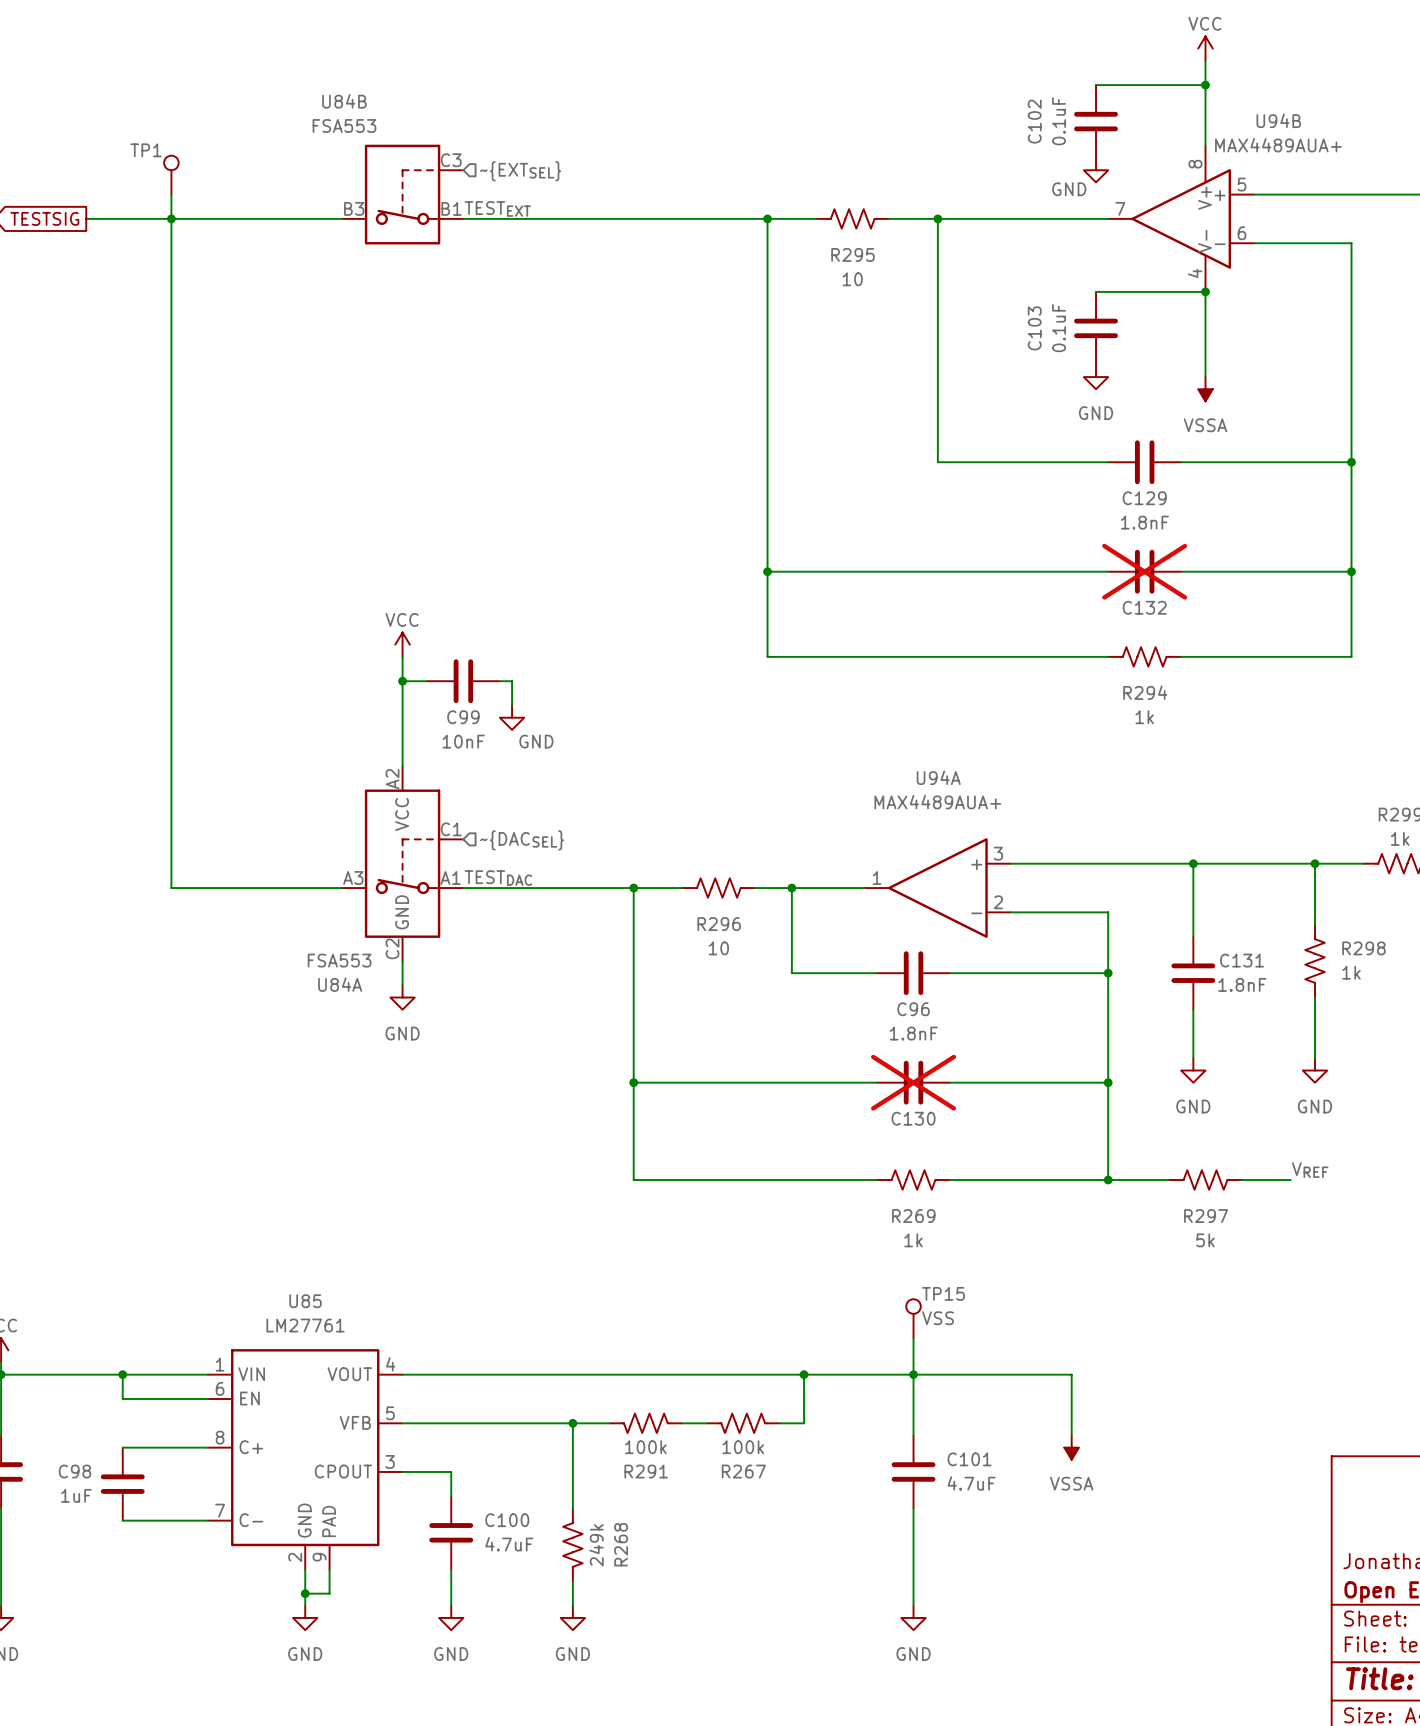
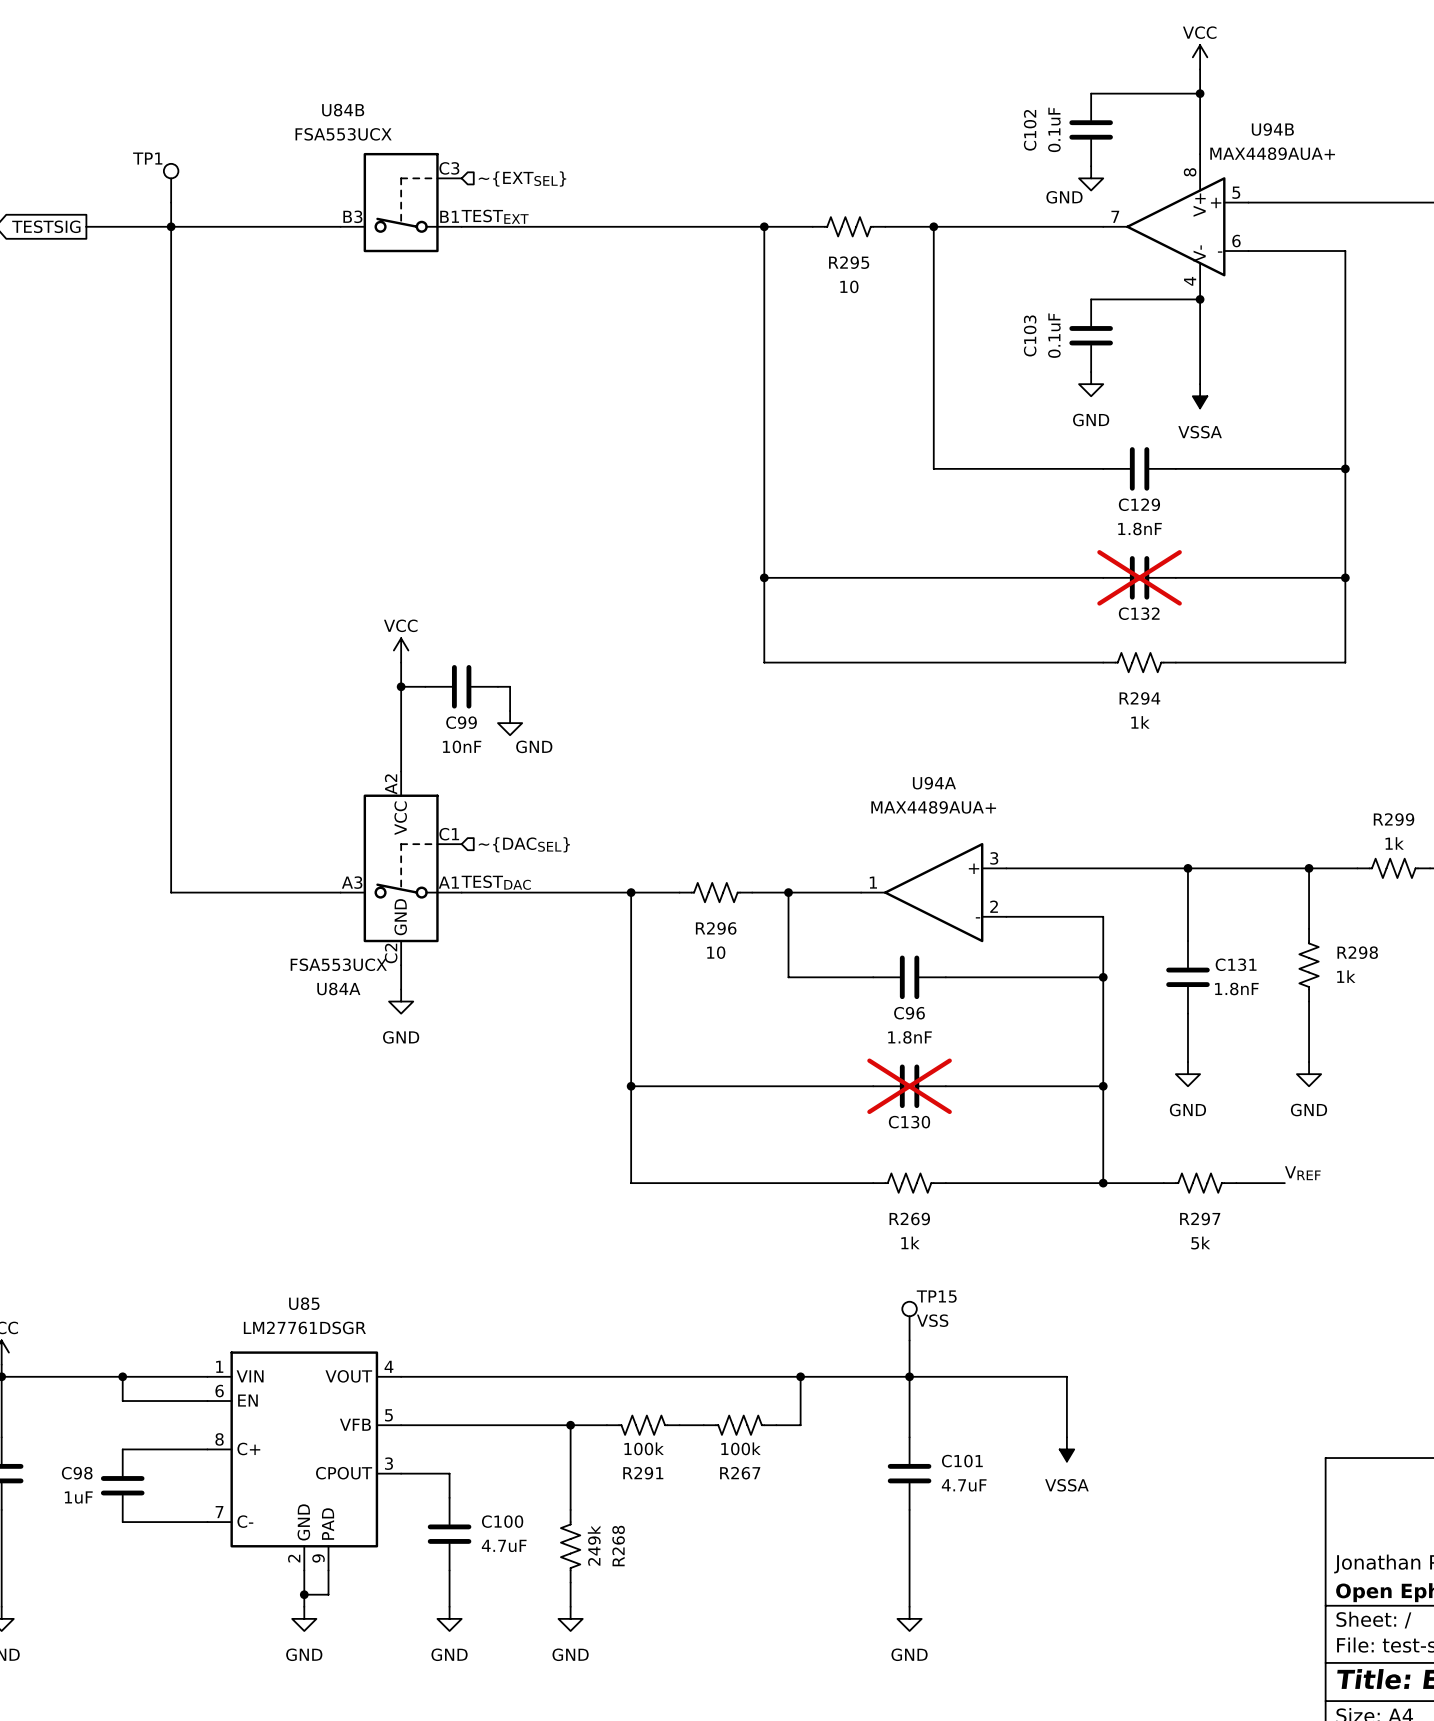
U84B value: FSA553 (344, 126) -> FSA553UCX (343, 134)
U84A value: FSA553 (339, 960) -> FSA553UCX (338, 964)
U85 value: LM27761 (305, 1325) -> LM27761DSGR (304, 1327)

